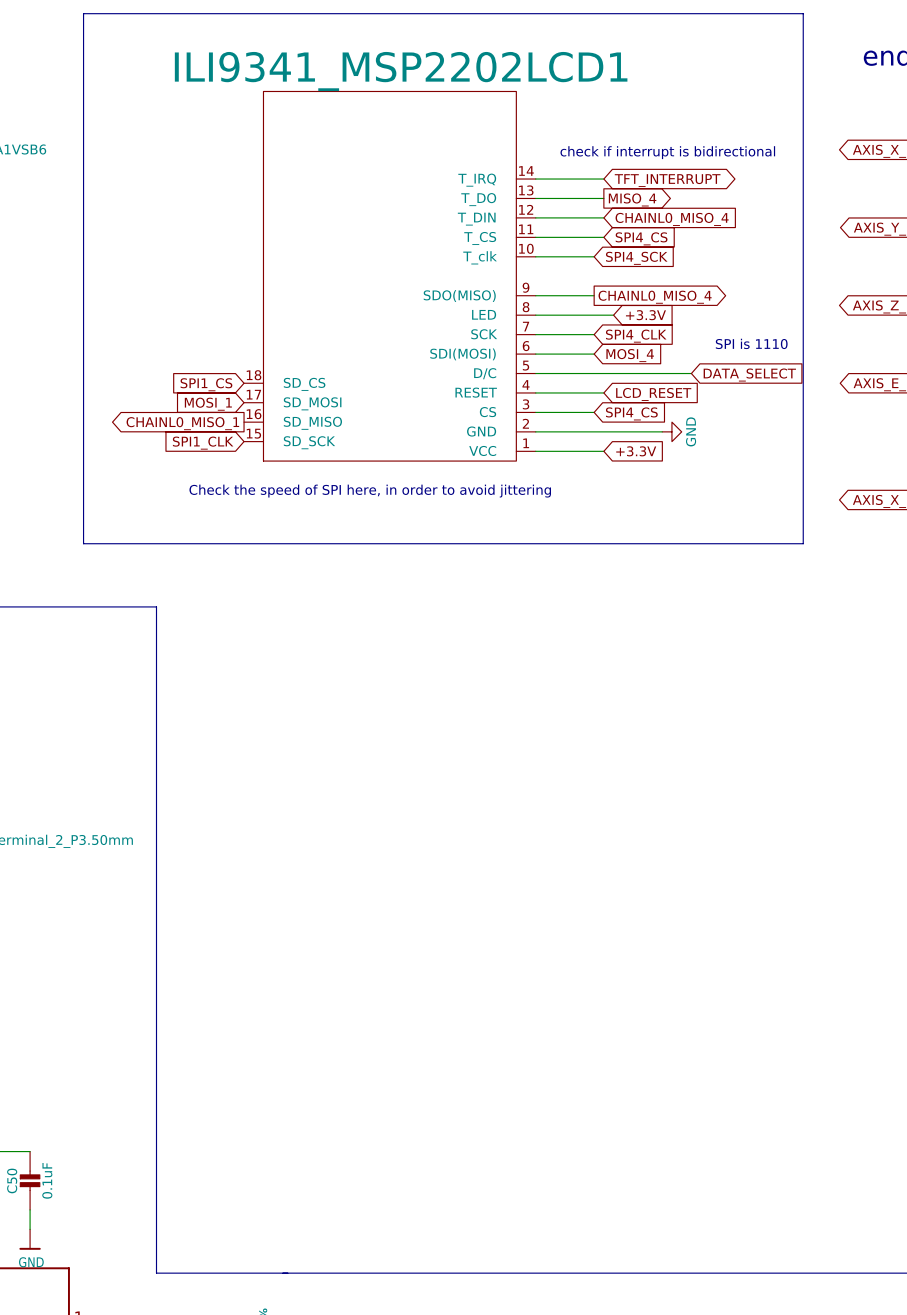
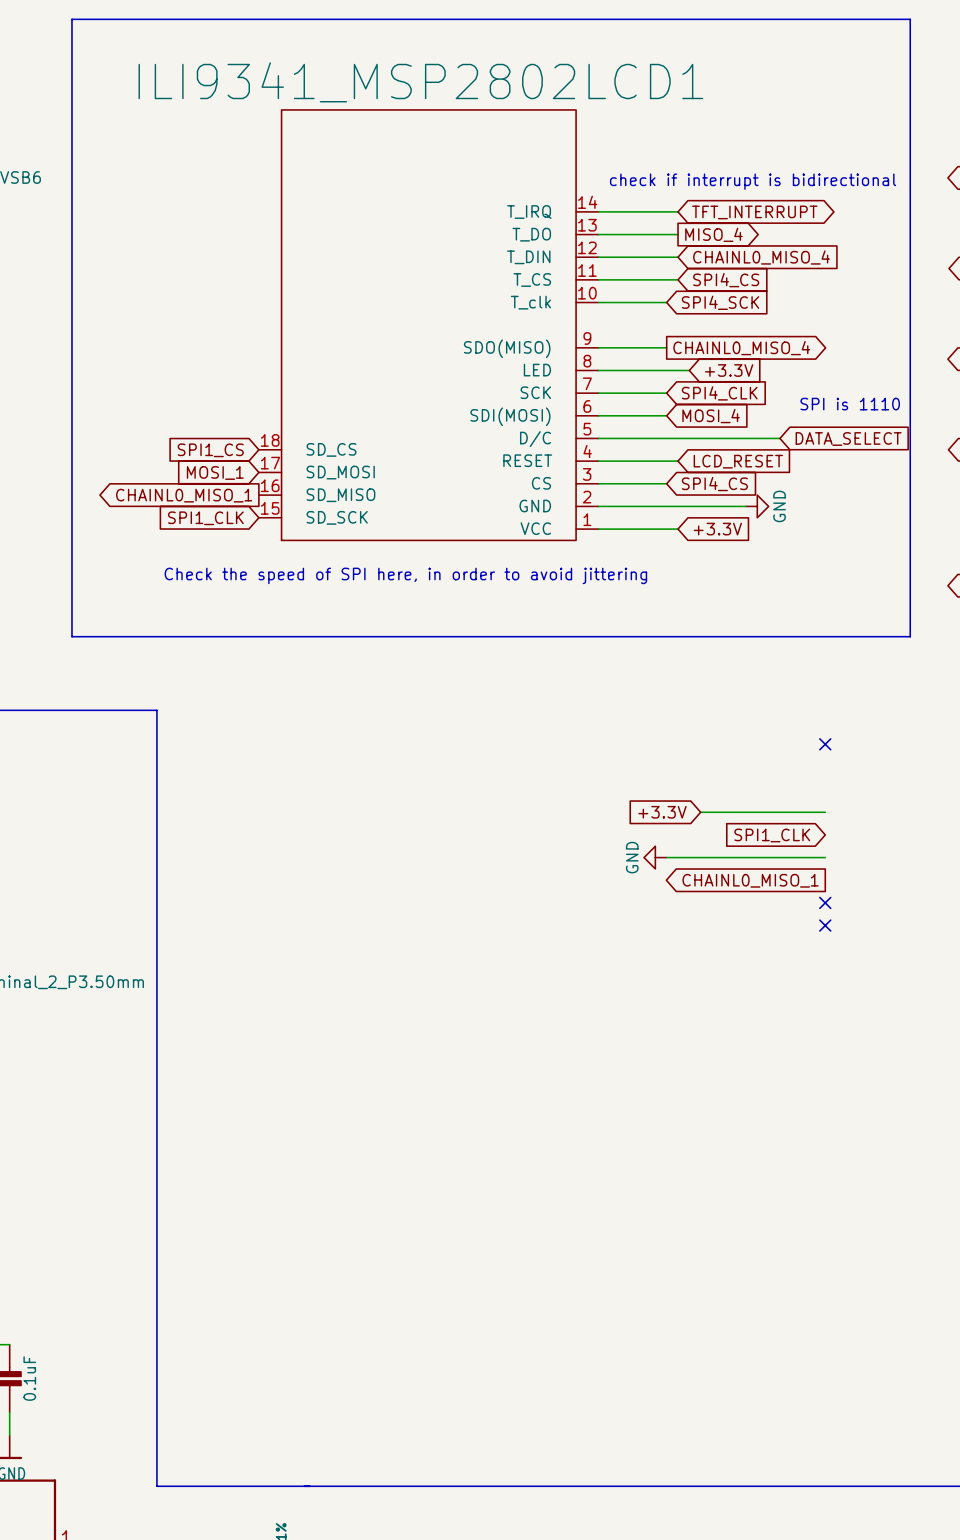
ILI9341_MSP2202LCD1 name: ILI9341_MSP2202LCD1 (401, 71) -> ILI9341_MSP2802LCD1 (420, 82)
no-connect mark: none -> (825, 744)
global label: none -> +3.3V (662, 812)
wire: none -> (700, 812) (825, 812)
global label: none -> SPI1_CLK (772, 835)
power symbol: none -> GND (655, 857)
wire: none -> (666, 857) (825, 857)
global label: none -> CHAINL0_MISO_1 (750, 880)
no-connect mark: none -> (825, 902)
no-connect mark: none -> (825, 925)

